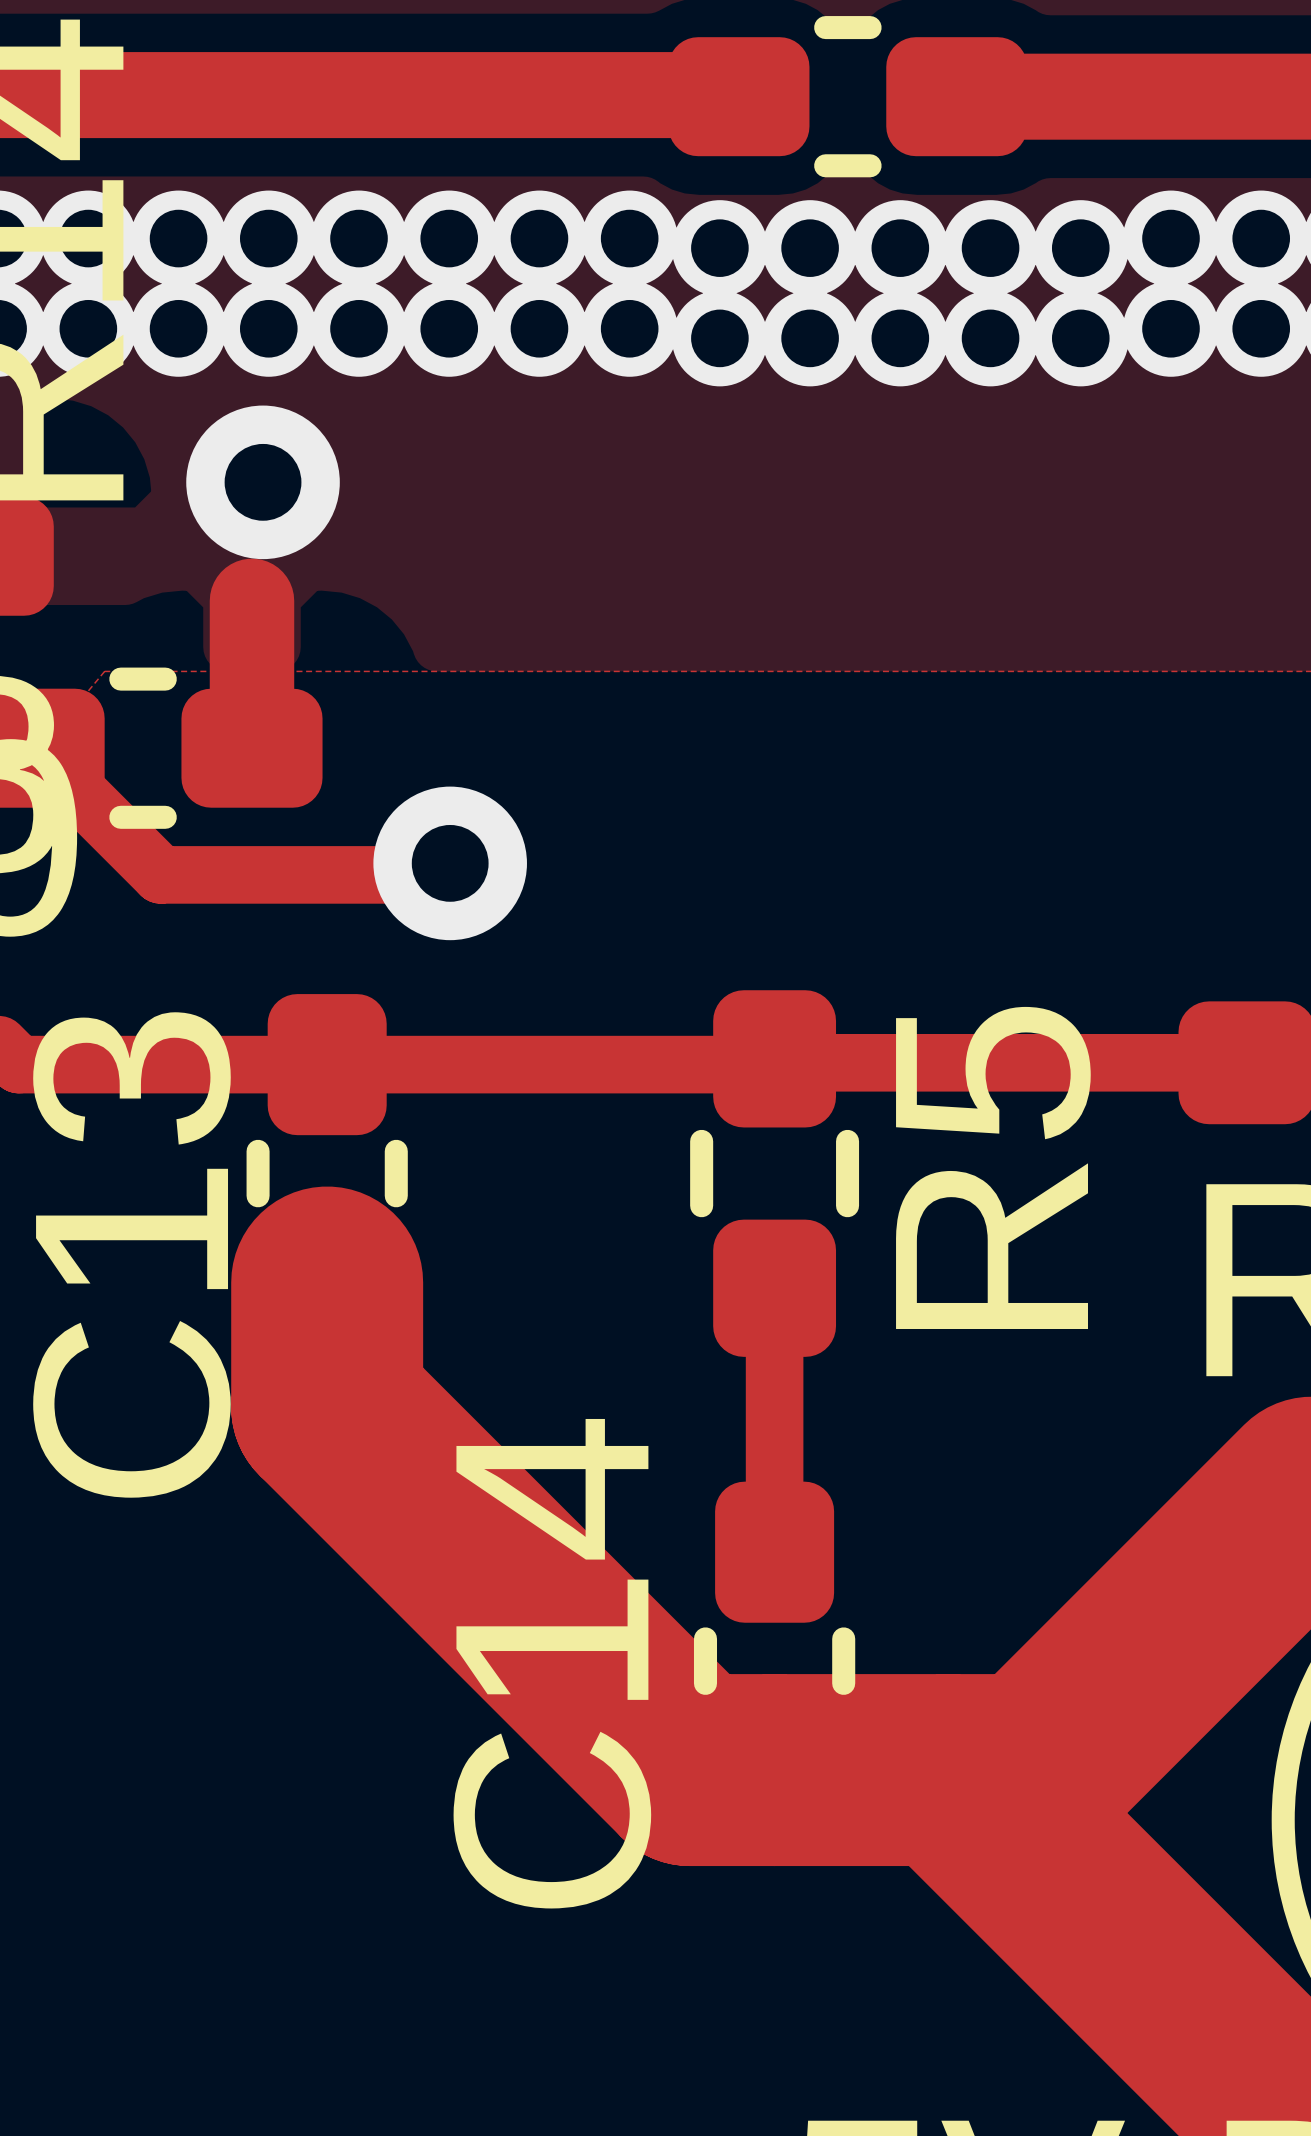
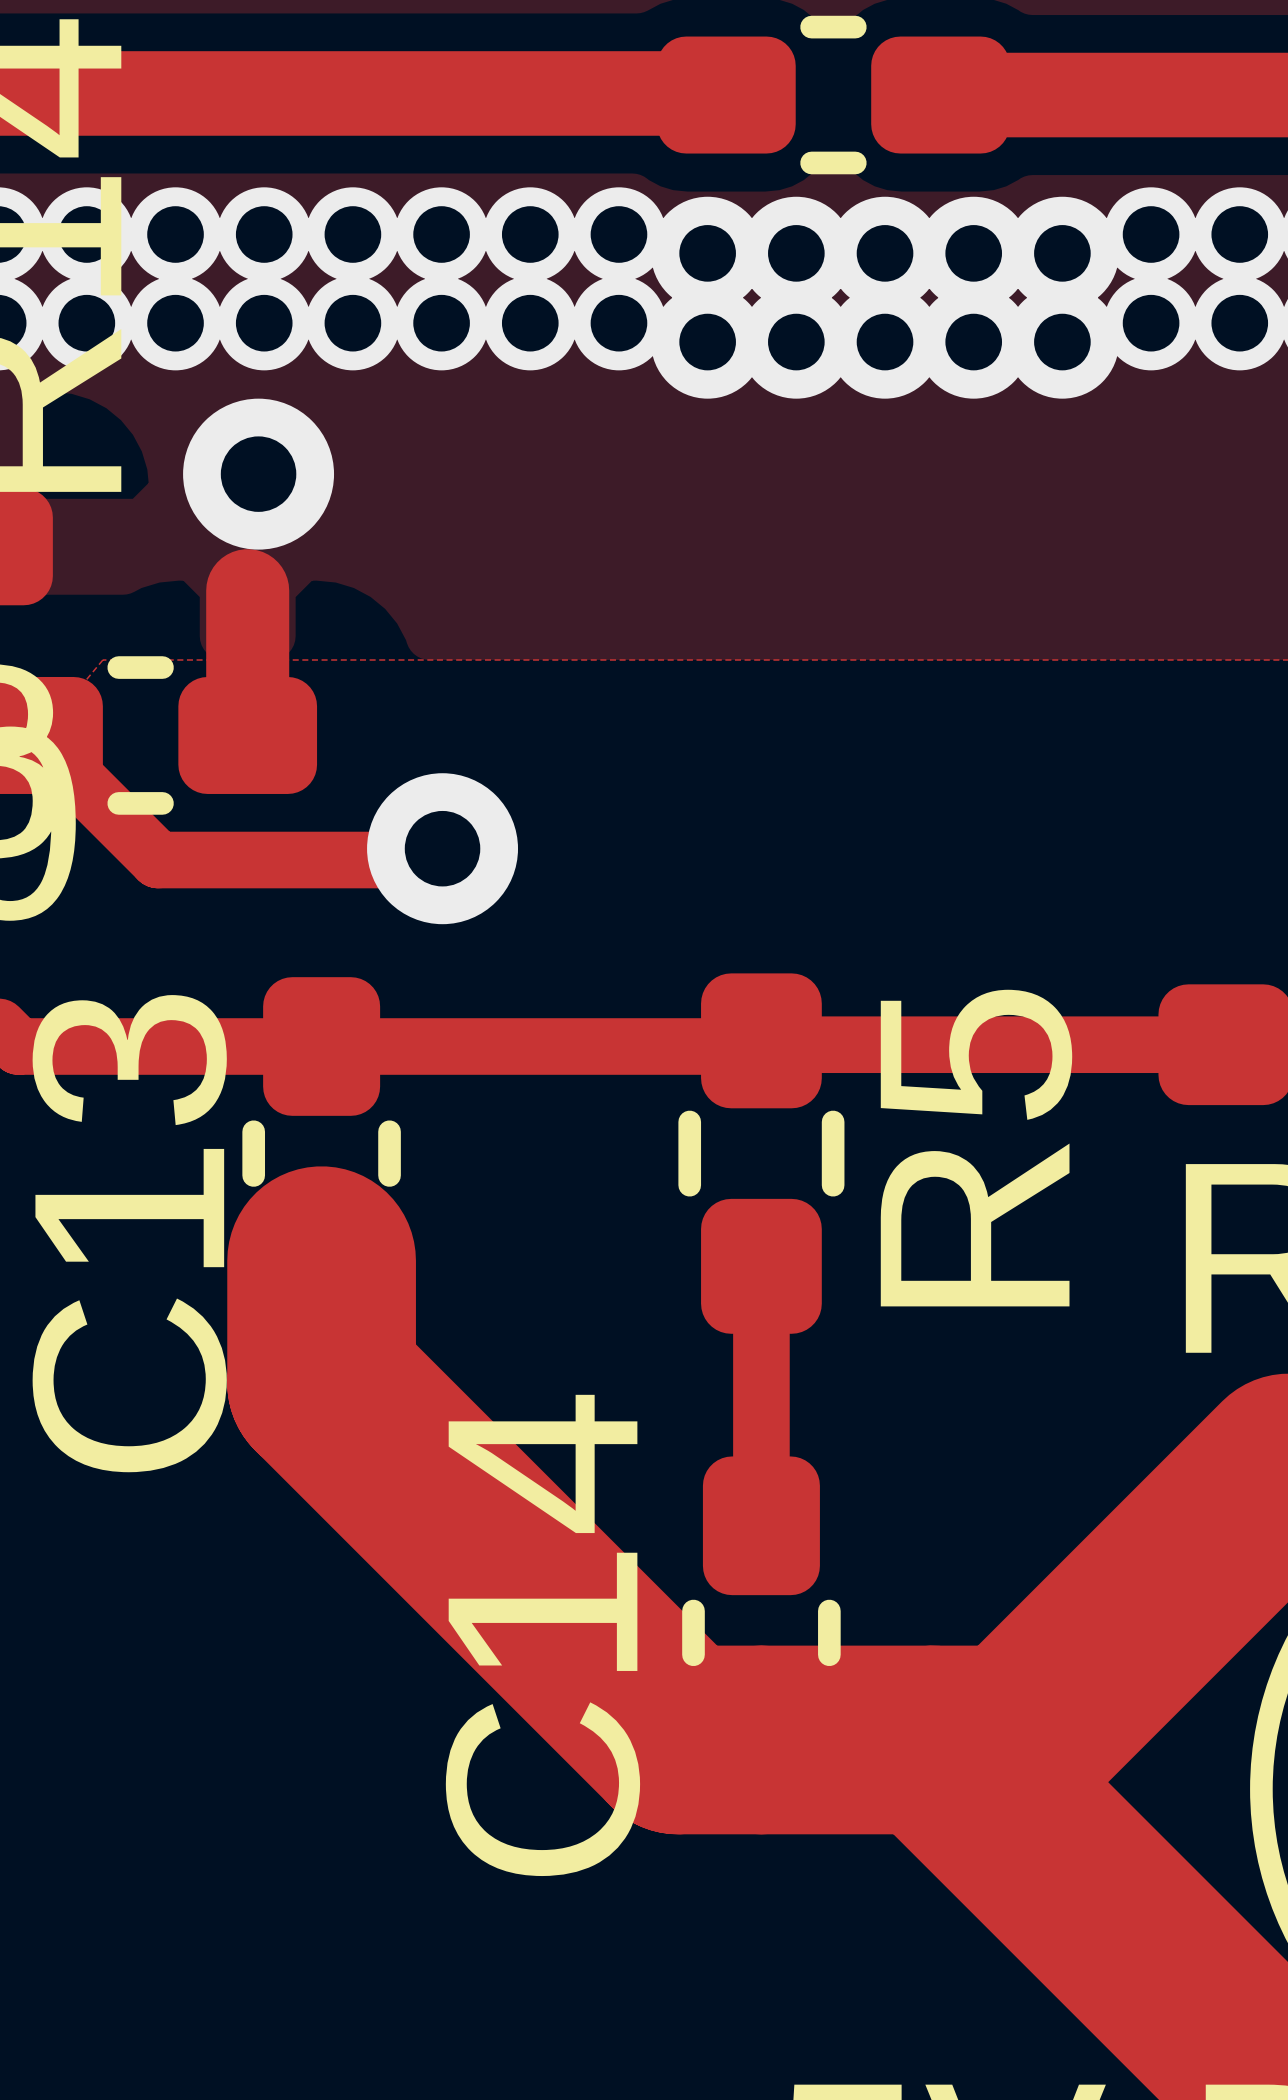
via size: [671, 200, 768, 297] -> [651, 196, 765, 310]
via size: [762, 200, 859, 297] -> [739, 196, 853, 310]
via size: [852, 200, 949, 297] -> [828, 196, 942, 310]
via size: [942, 200, 1039, 297] -> [917, 196, 1031, 310]
via size: [1032, 200, 1129, 297] -> [1005, 196, 1120, 310]
via size: [671, 290, 768, 387] -> [651, 285, 765, 399]
via size: [762, 290, 859, 387] -> [739, 285, 853, 399]
via size: [852, 290, 949, 387] -> [828, 285, 942, 399]
via size: [942, 290, 1039, 387] -> [917, 285, 1031, 399]
via size: [1032, 290, 1129, 387] -> [1005, 285, 1120, 399]

